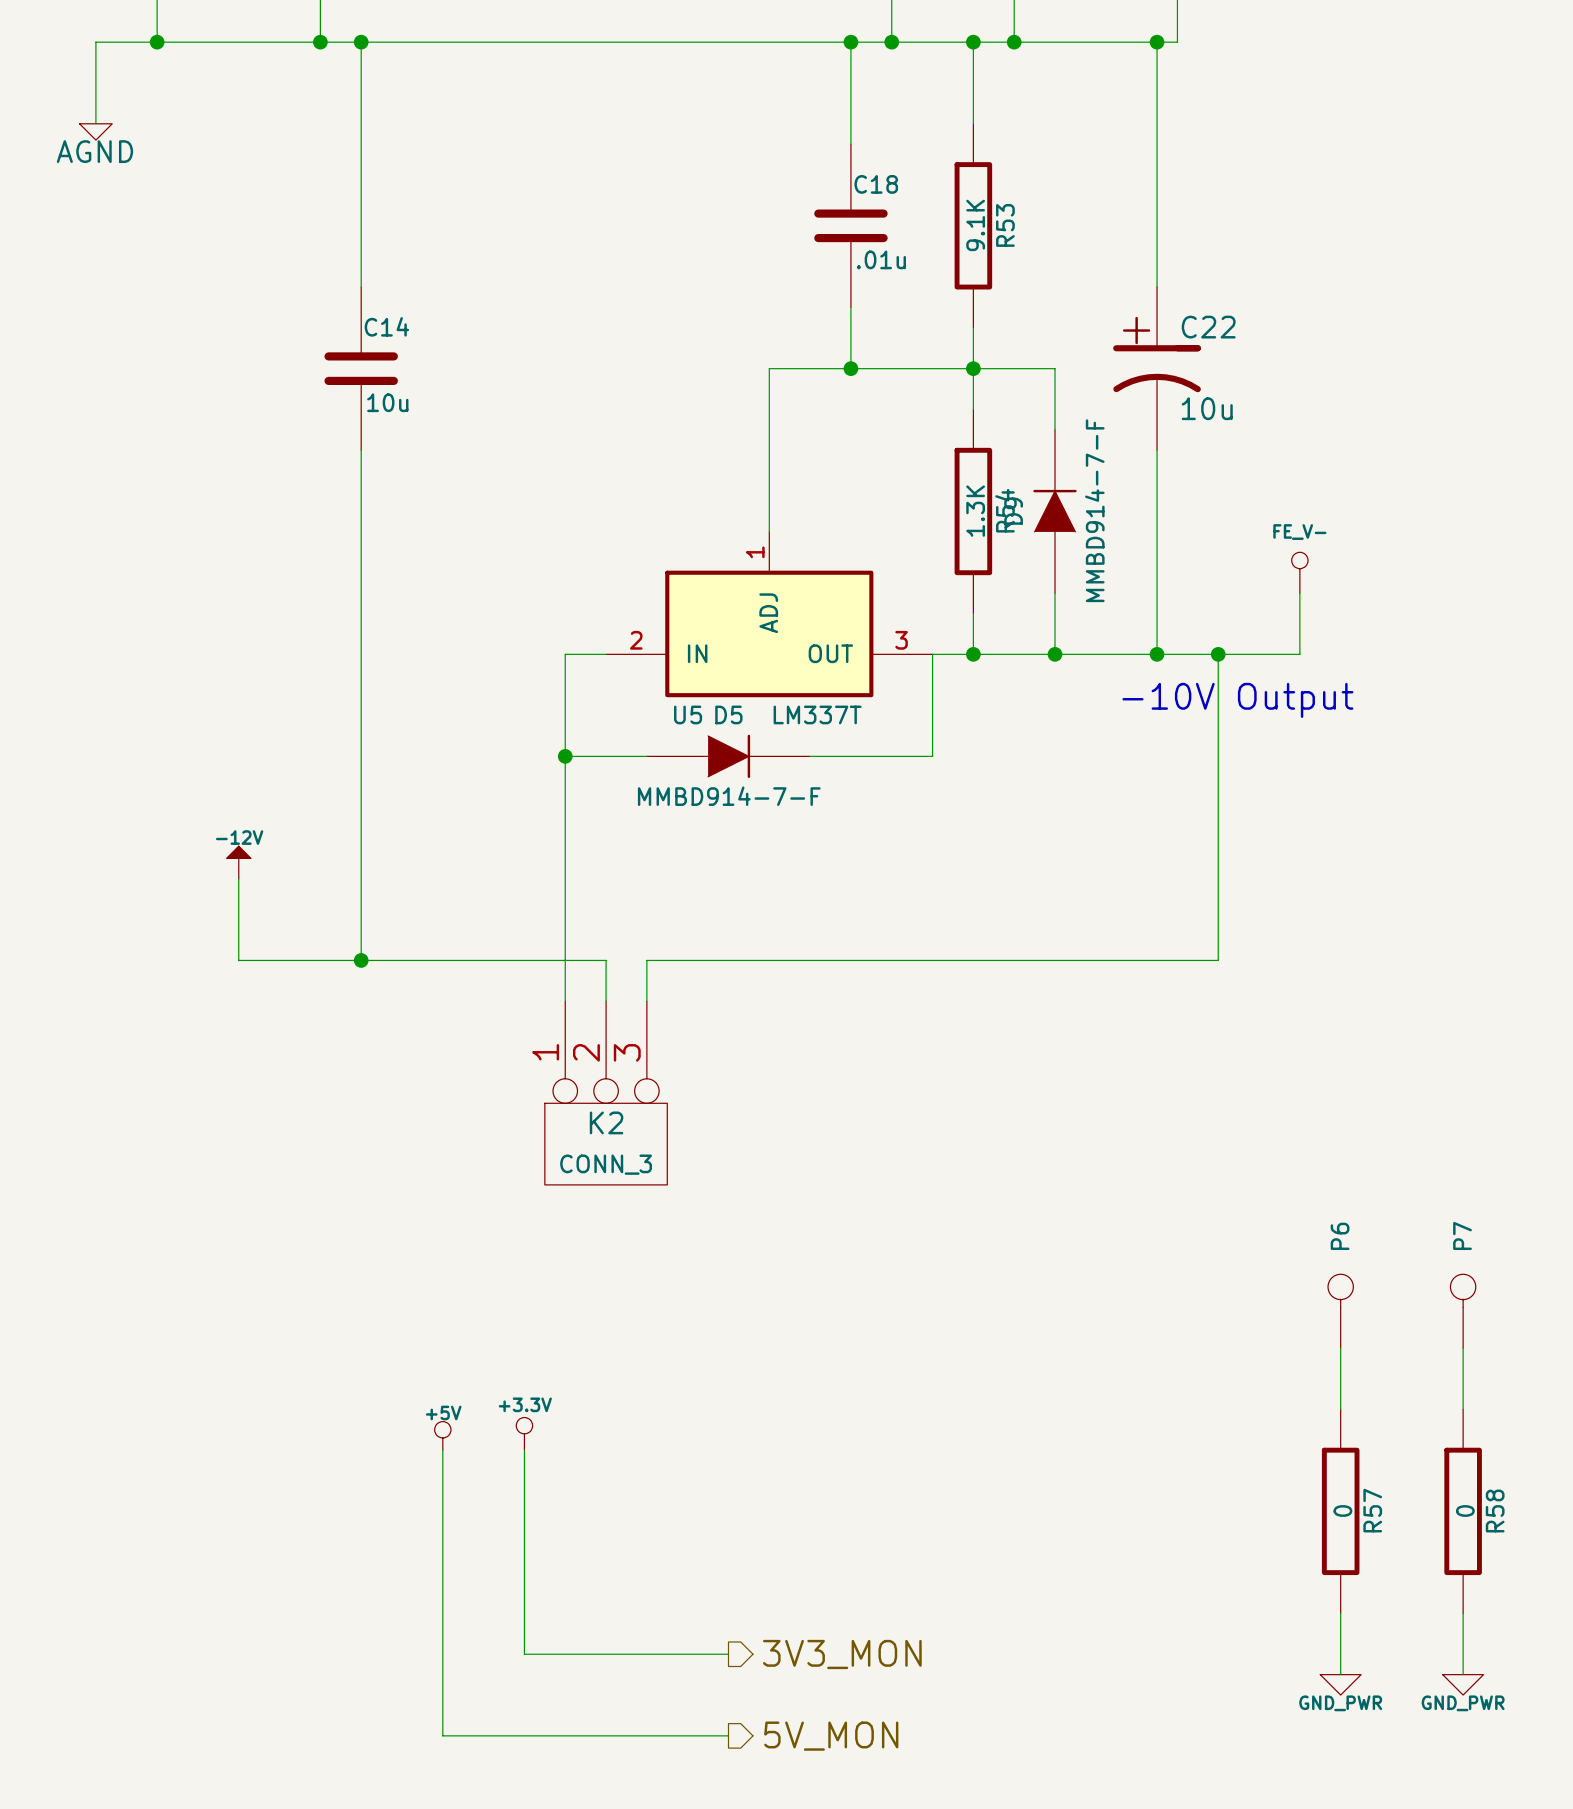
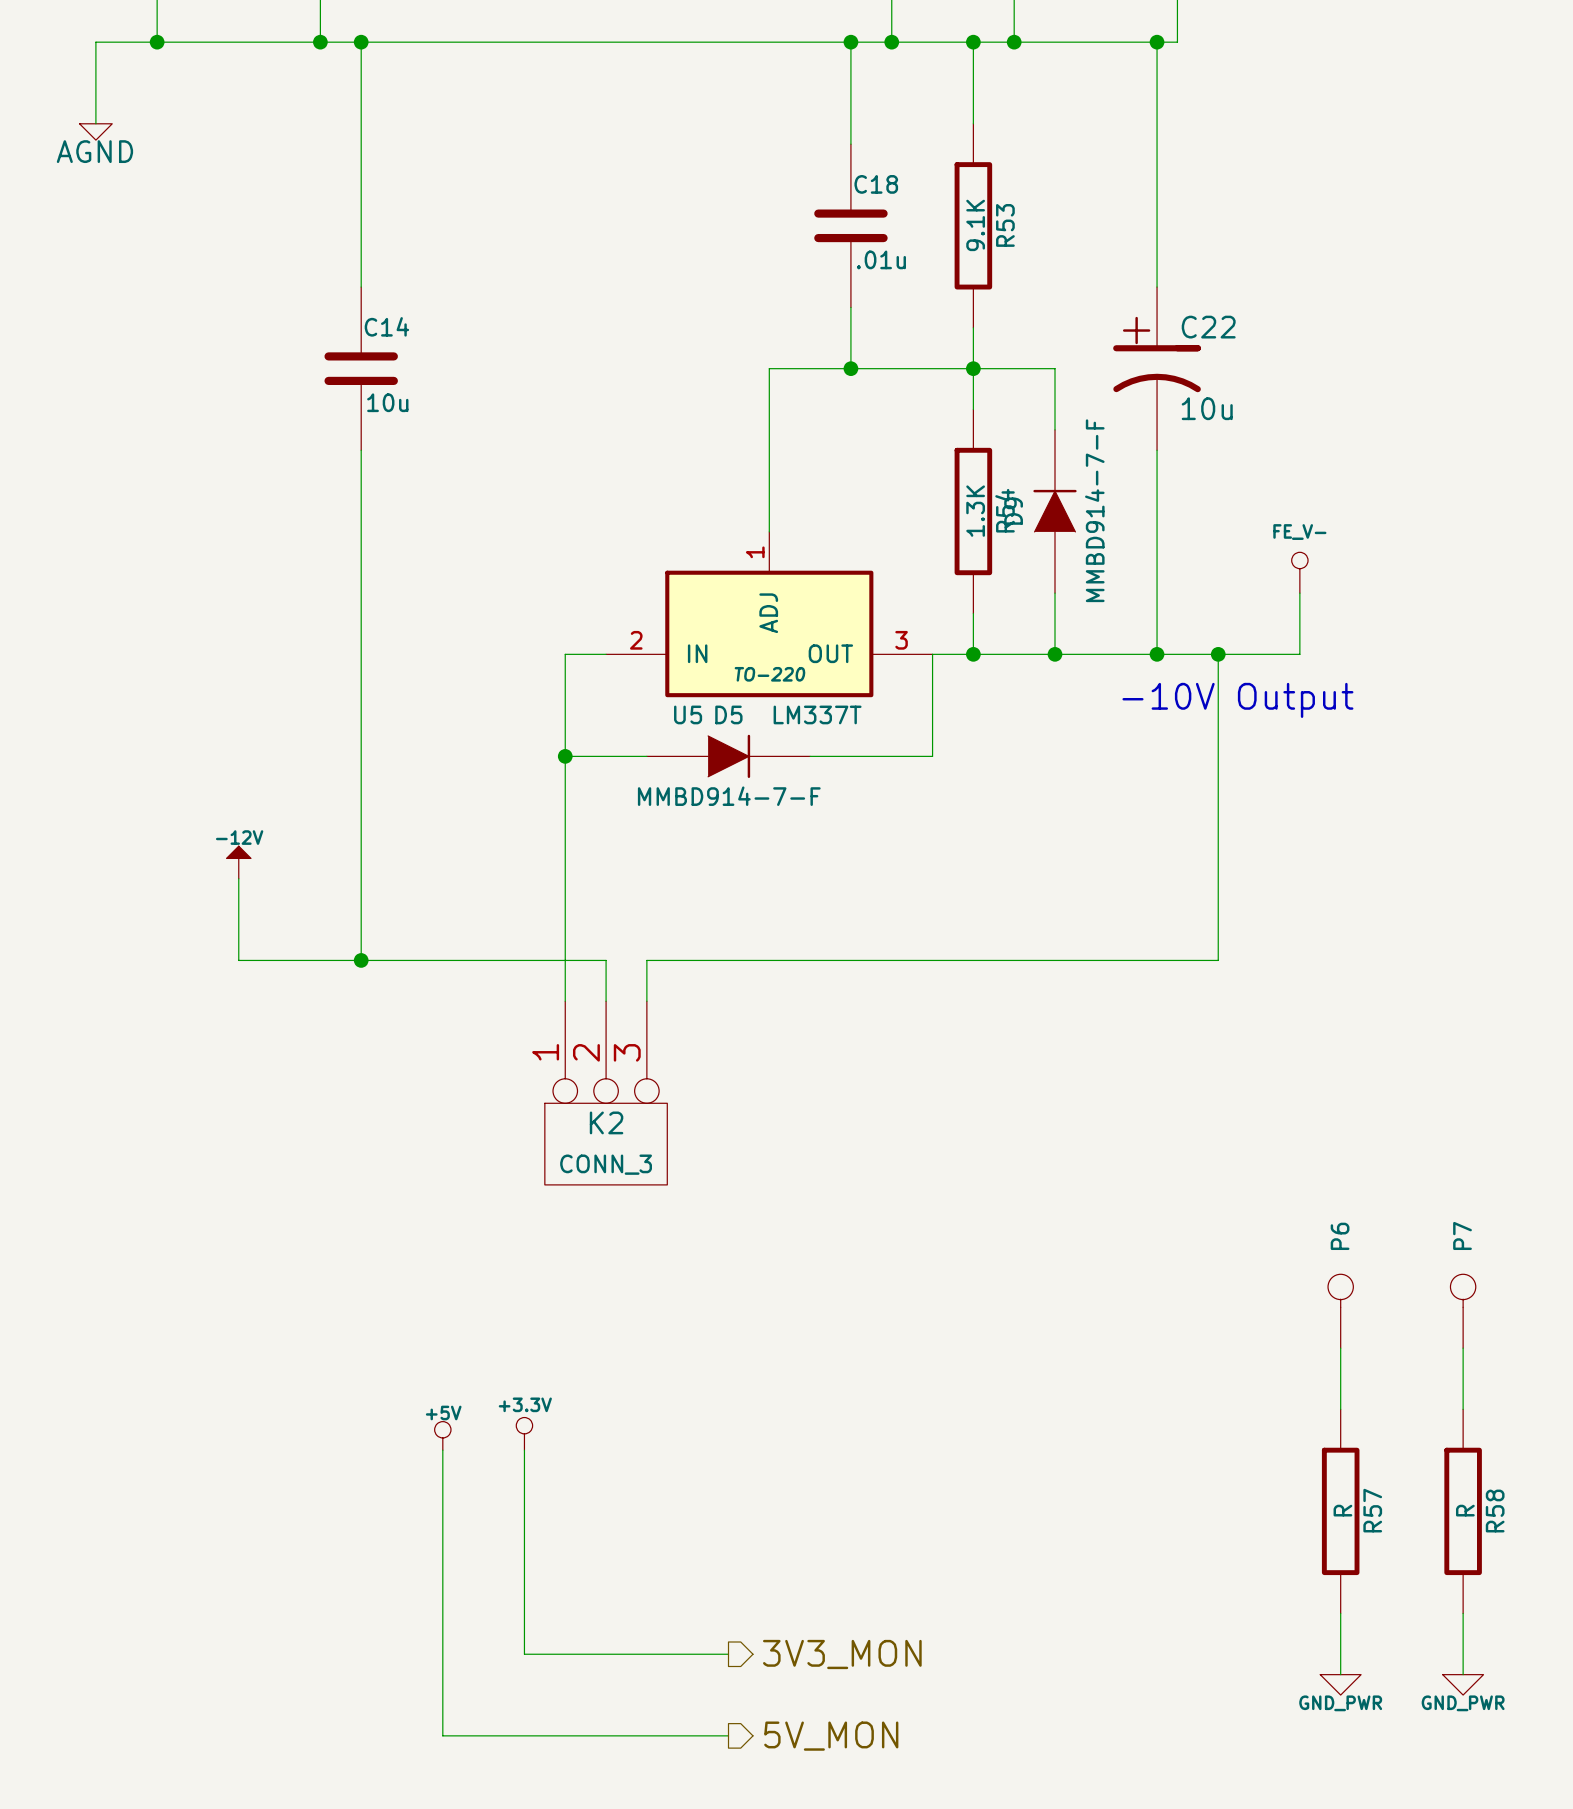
U5 text: none -> TO-220 (769, 674)
R57 value: 0 (1342, 1510) -> R (1342, 1510)
R58 value: 0 (1465, 1510) -> R (1465, 1510)

